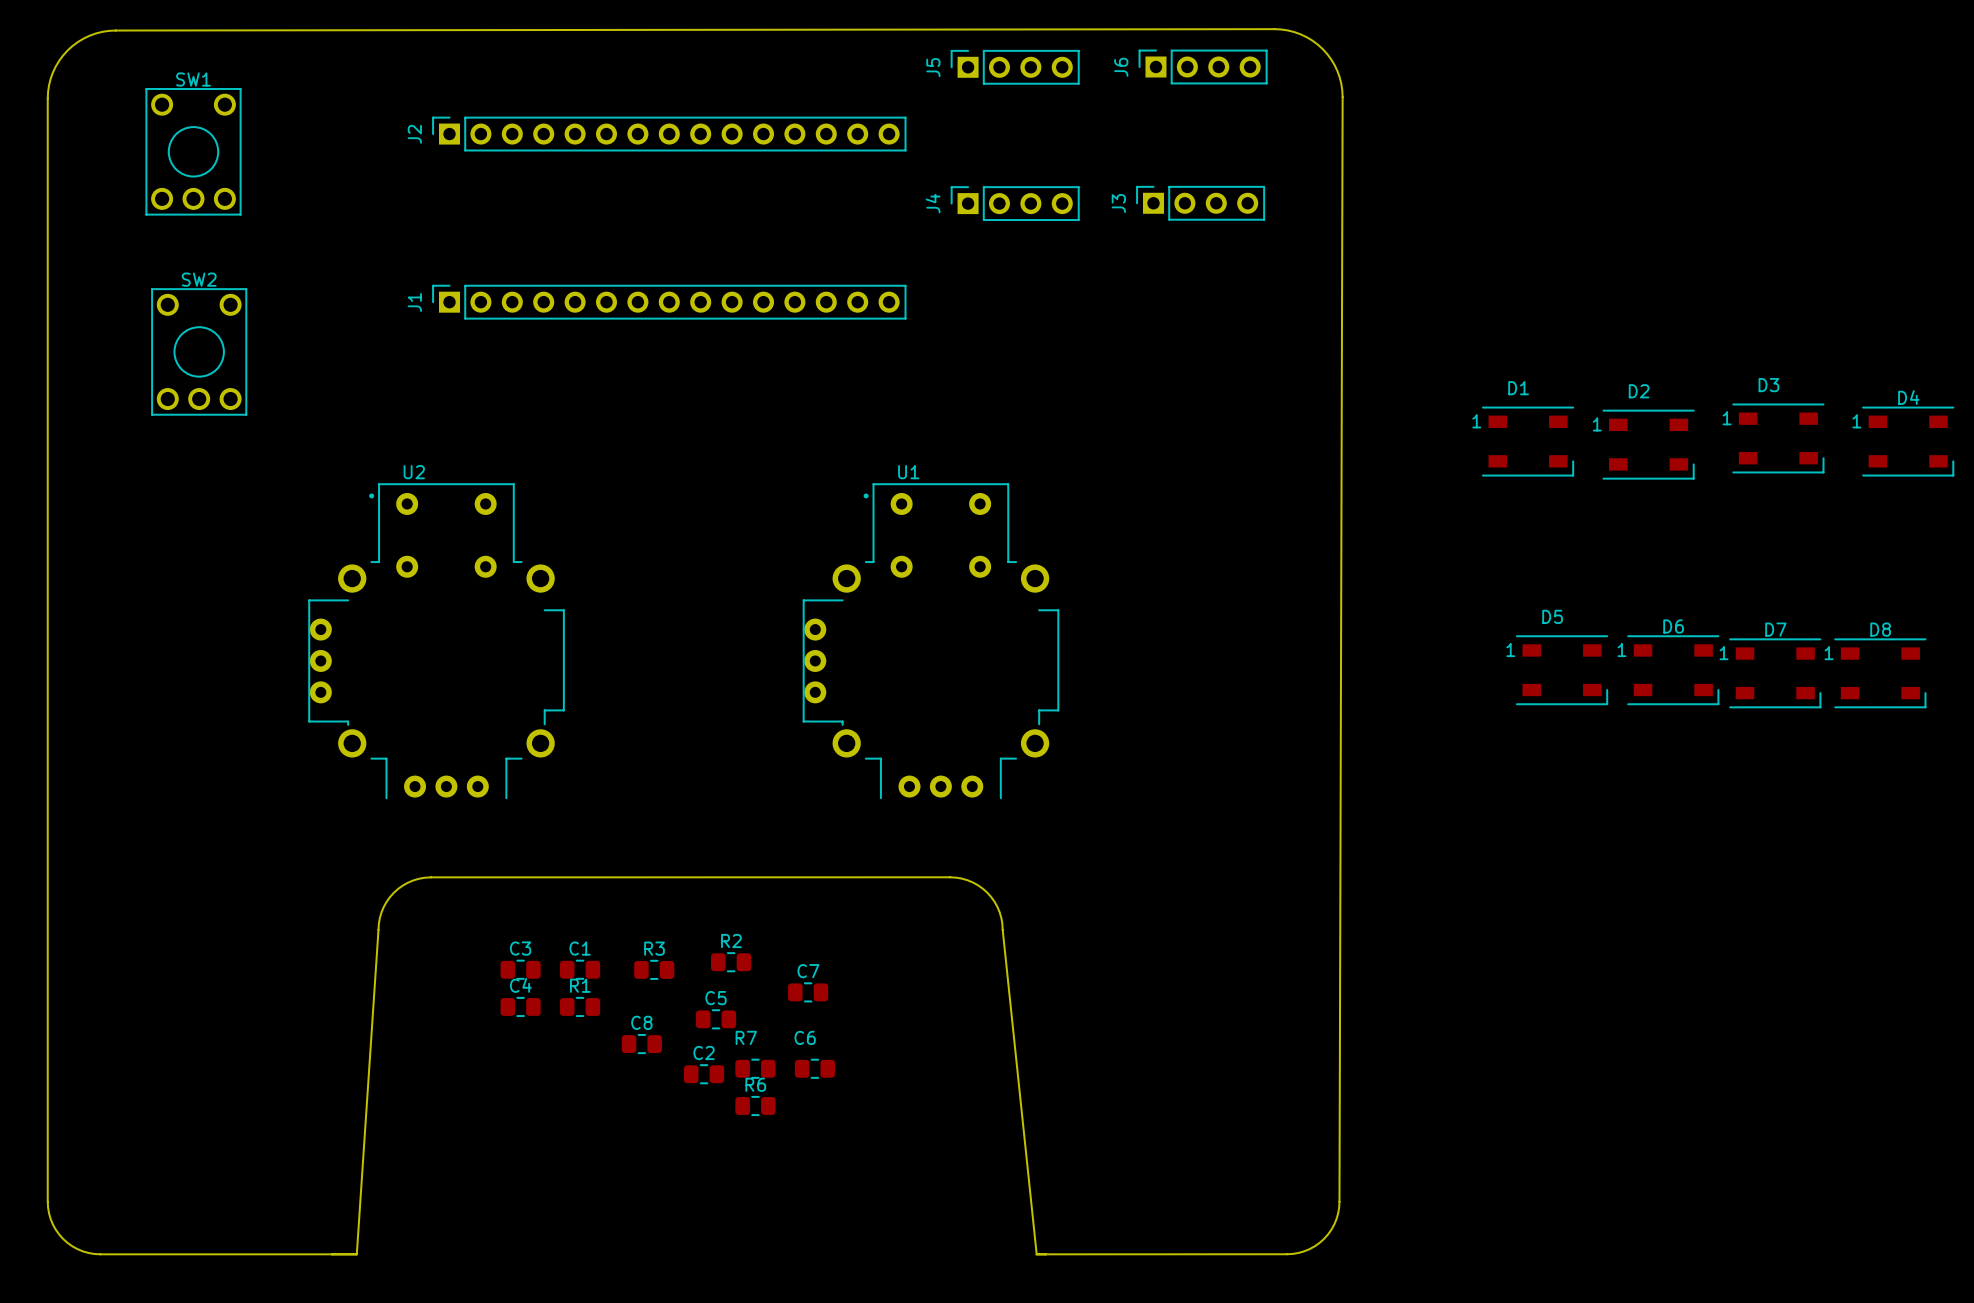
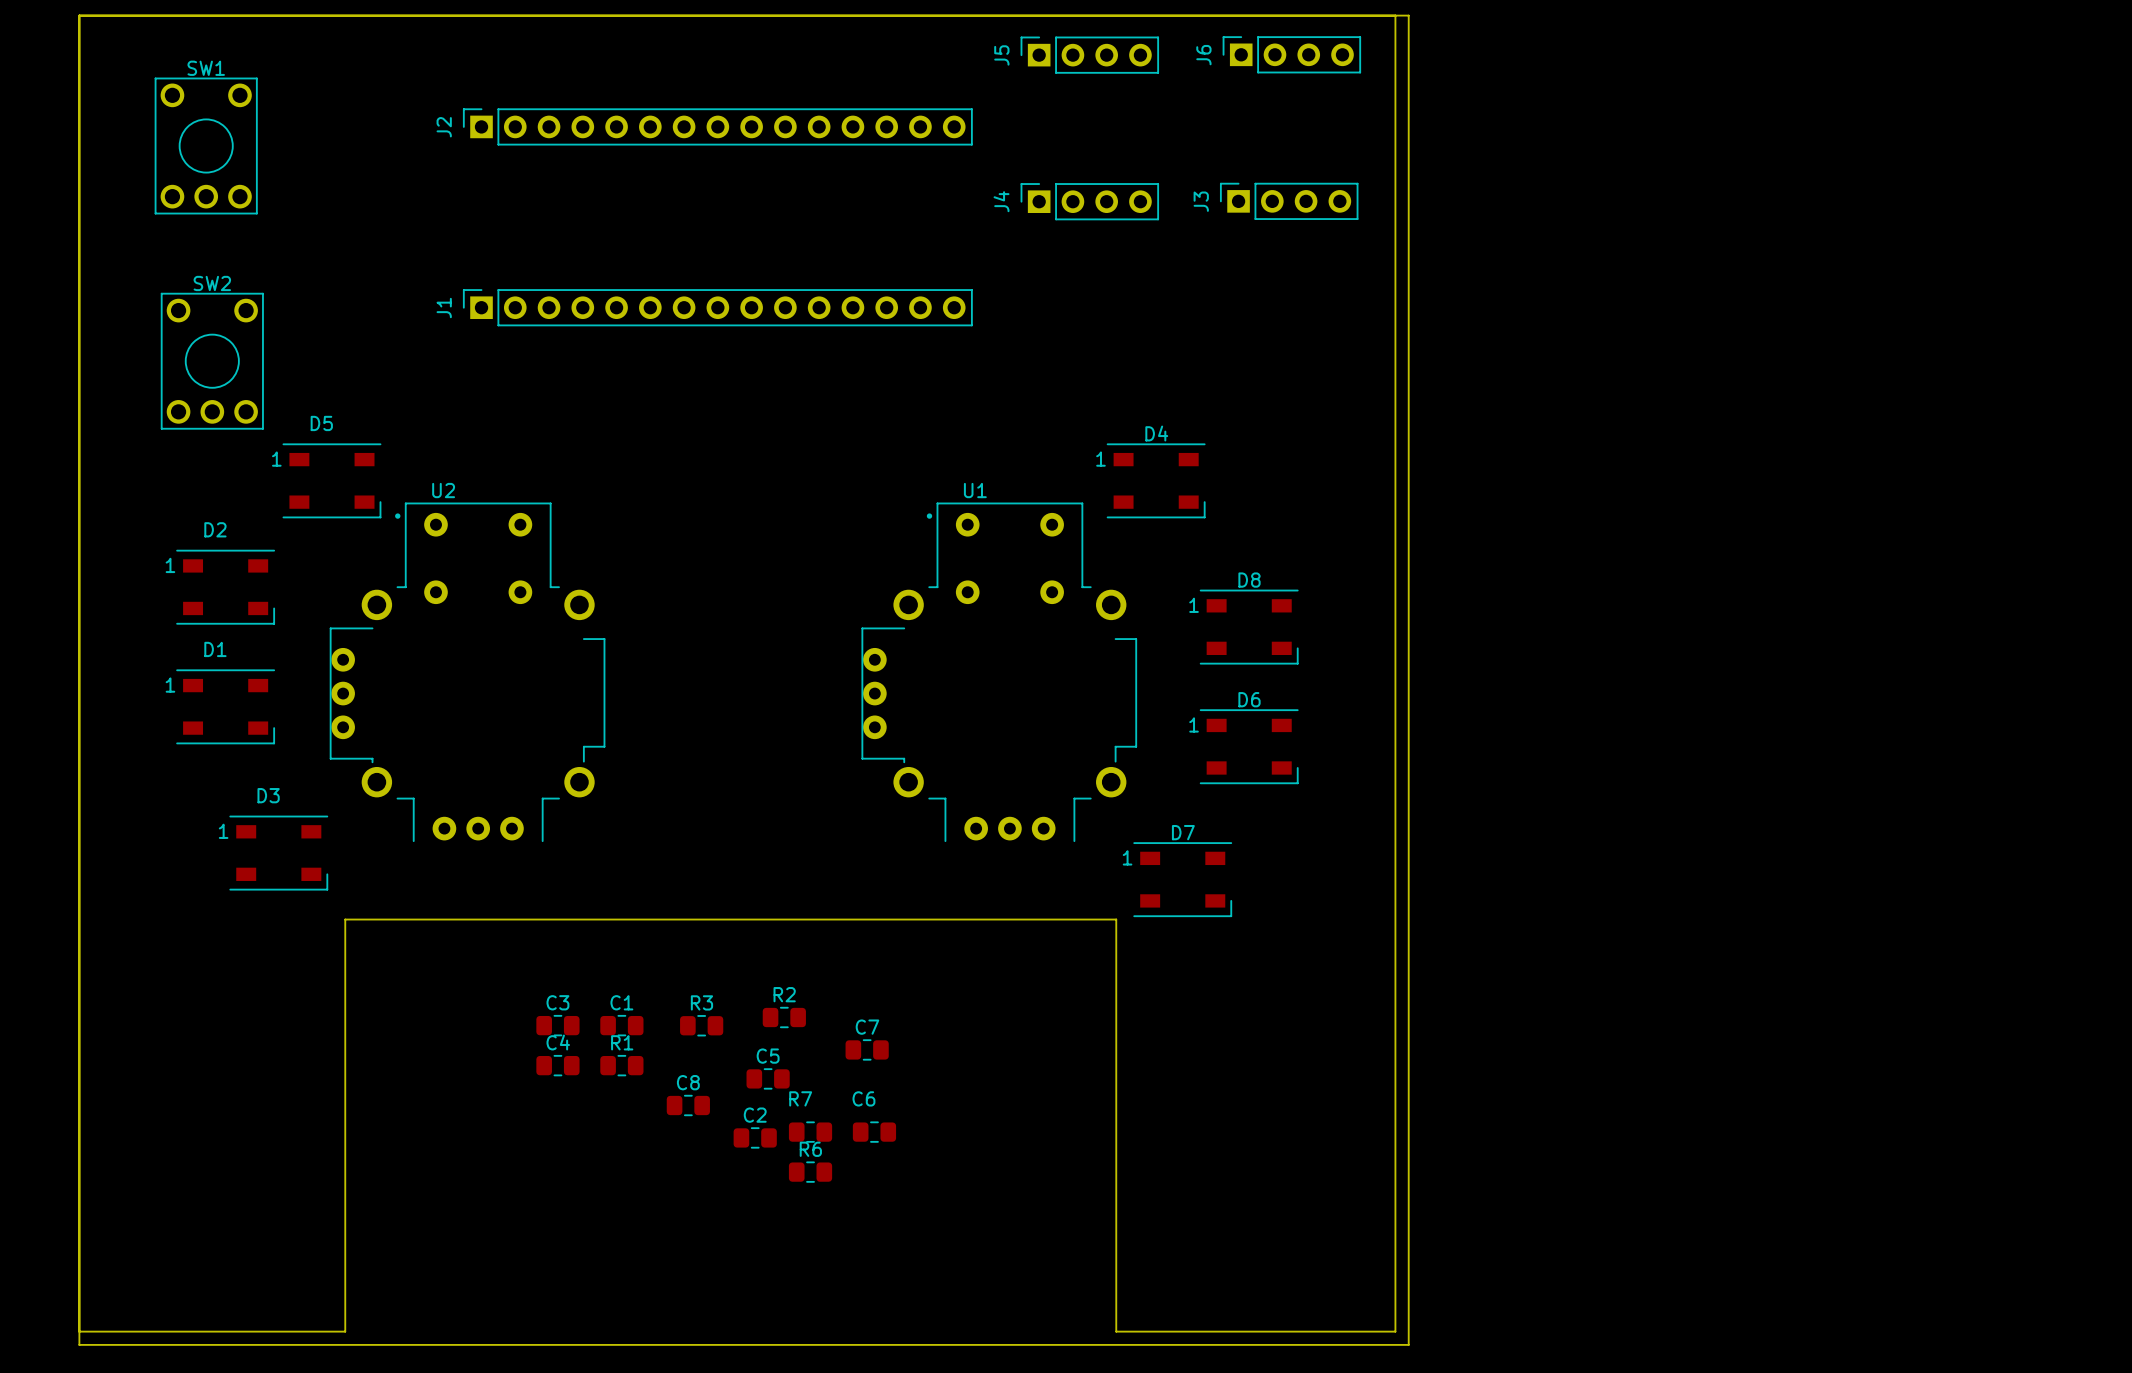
board edge: none -> (79, 15) (1408, 15) (1408, 1344) (79, 1344) (79, 15)
board edge: none -> (1395, 15) (1395, 1331) (1122, 1331)
D3 position: (1778, 438) -> (278, 853)
D1 position: (1528, 441) -> (225, 706)
D4 position: (1908, 441) -> (1156, 480)
D2 position: (1648, 444) -> (225, 587)
D5 position: (1562, 670) -> (331, 480)
D6 position: (1673, 670) -> (1249, 746)
D7 position: (1775, 673) -> (1182, 879)
D8 position: (1880, 673) -> (1249, 627)
board edge: (100, 1254) (82, 1251) (63, 1238) (52, 1224) (47, 1201) (47, 98) (52, 72) (67, 50) (89, 35) (115, 30) (1287, 30) (1312, 40) (1327, 54) (1339, 77) (1342, 97) (1338, 1213) (1331, 1229) (1319, 1242) (1304, 1251) (1292, 1253) (1045, 1254) -> (105, 1331) (79, 1331)
board edge: (322, 1254) (356, 1254) (378, 924) (386, 901) (403, 885) (419, 878) (431, 877) (950, 877) (967, 880) (982, 888) (994, 901) (1001, 918) (1036, 1254) (1039, 1254) -> (345, 1331) (345, 919) (1116, 919) (1116, 1331)

